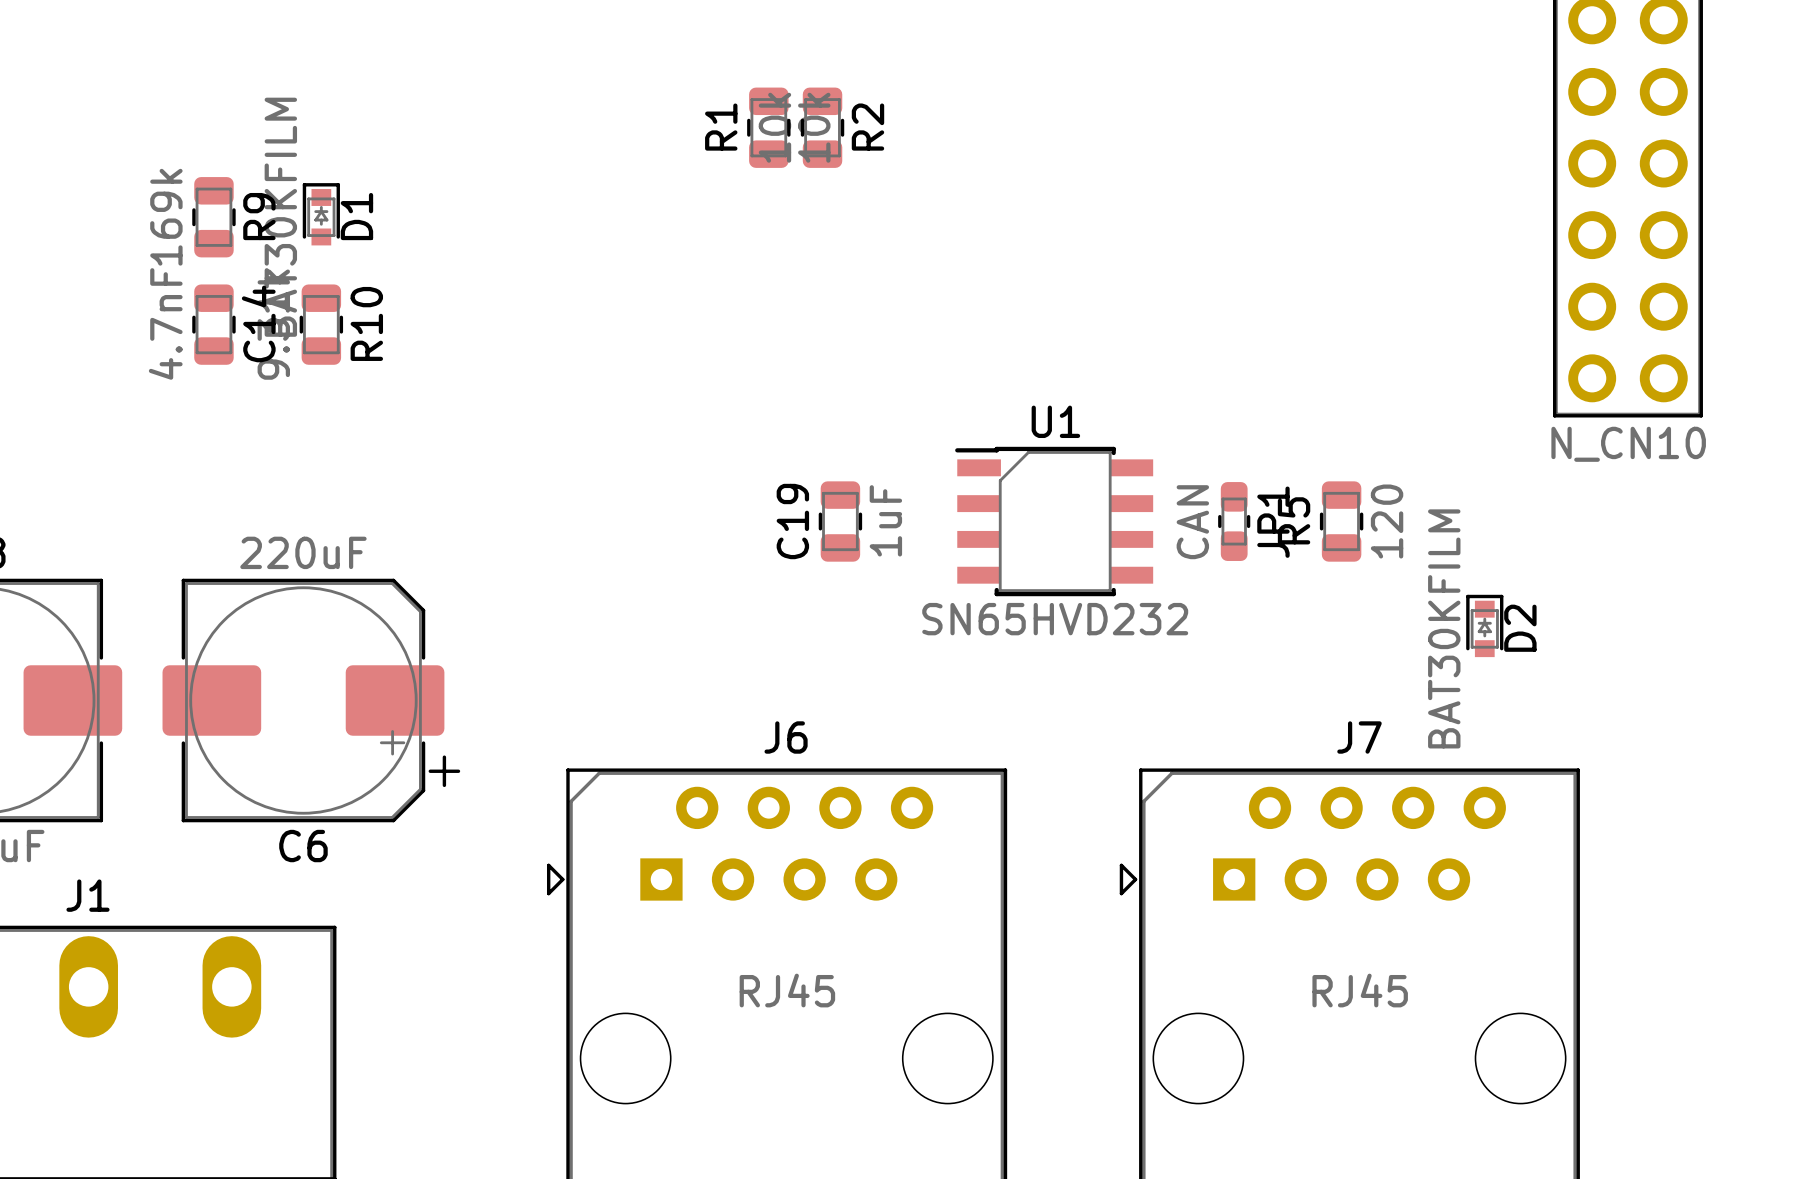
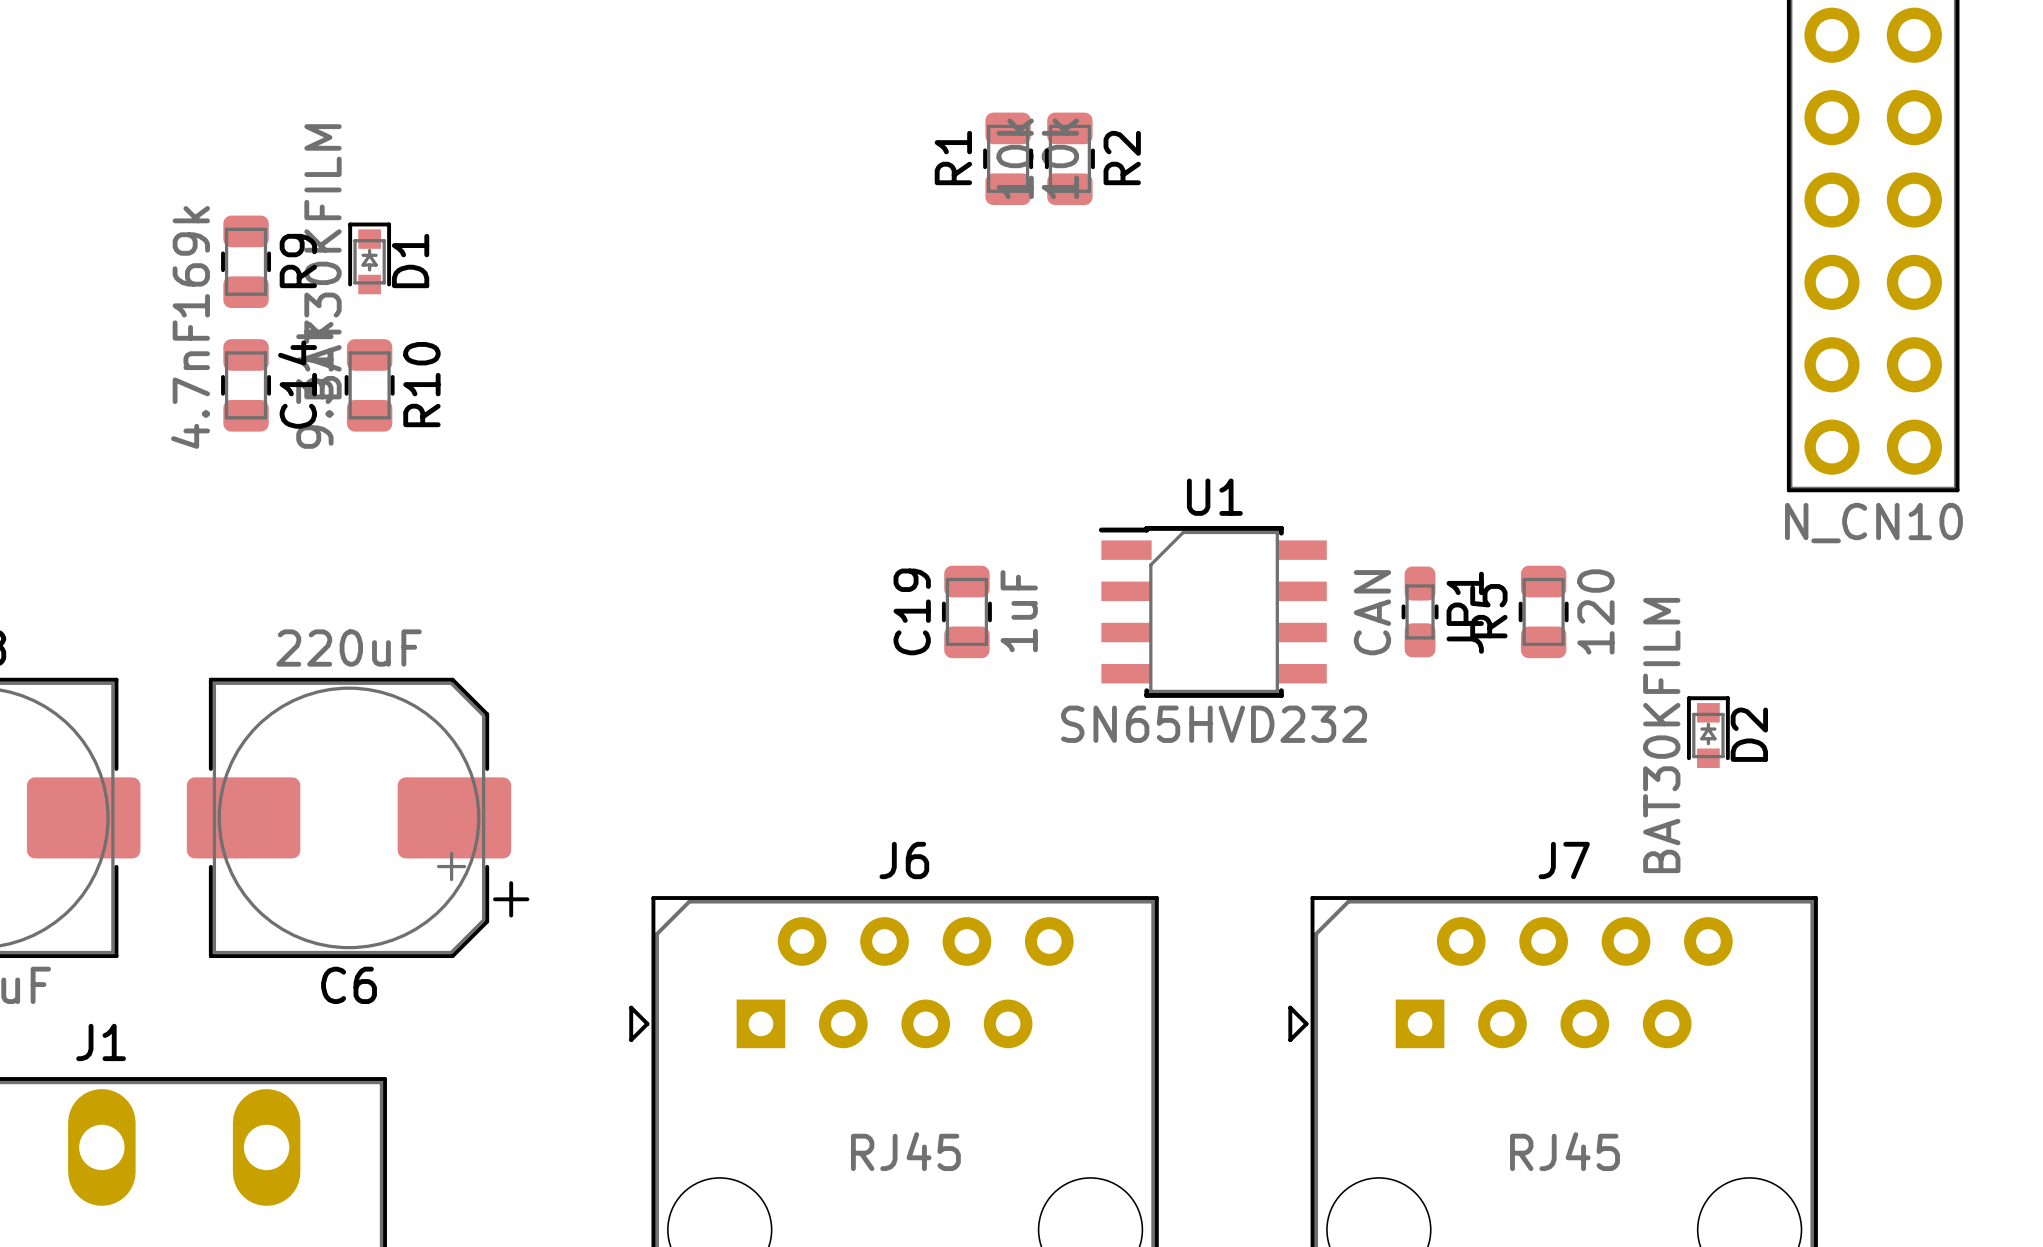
R1 position: (768, 127) -> (1008, 158)
R2 position: (822, 127) -> (1069, 158)

